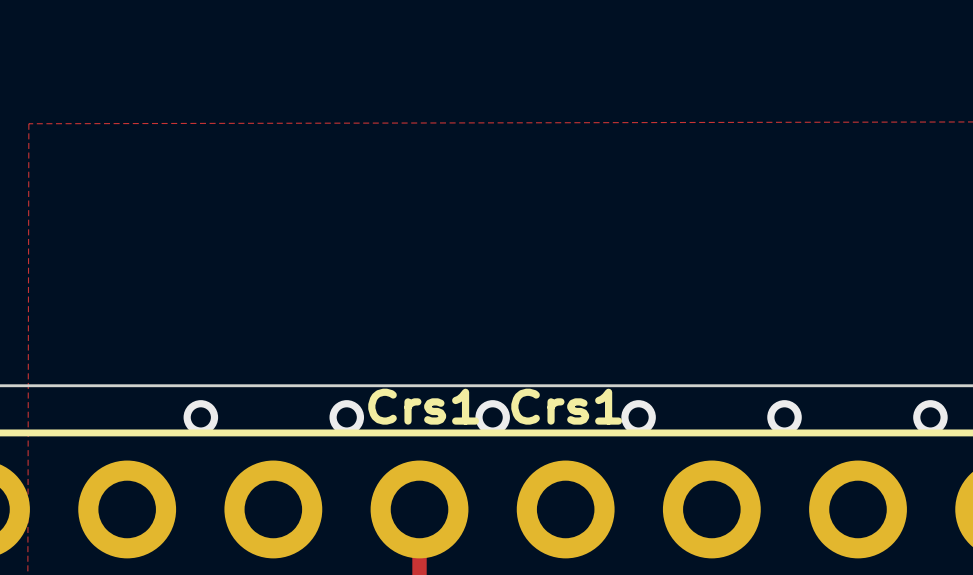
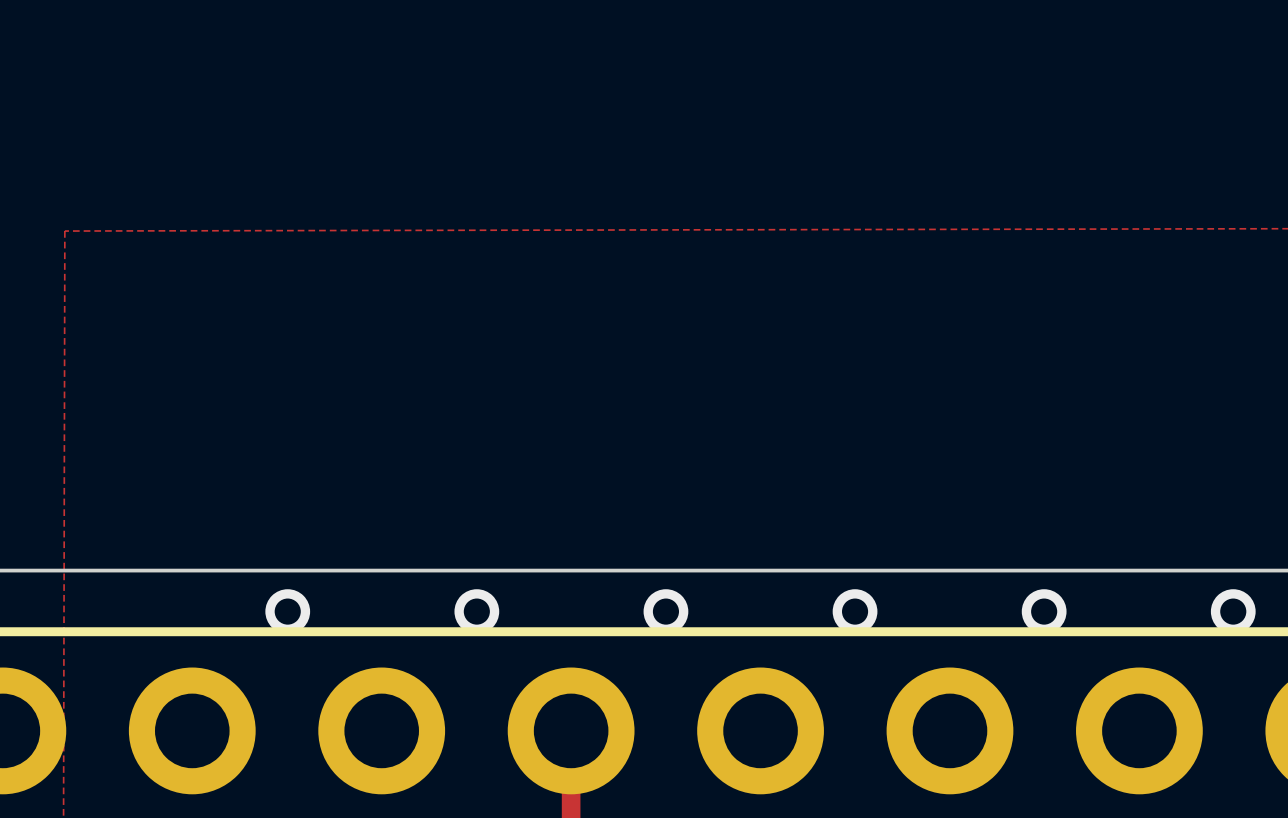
text: Crs1 Crs1 (495, 406) -> none

